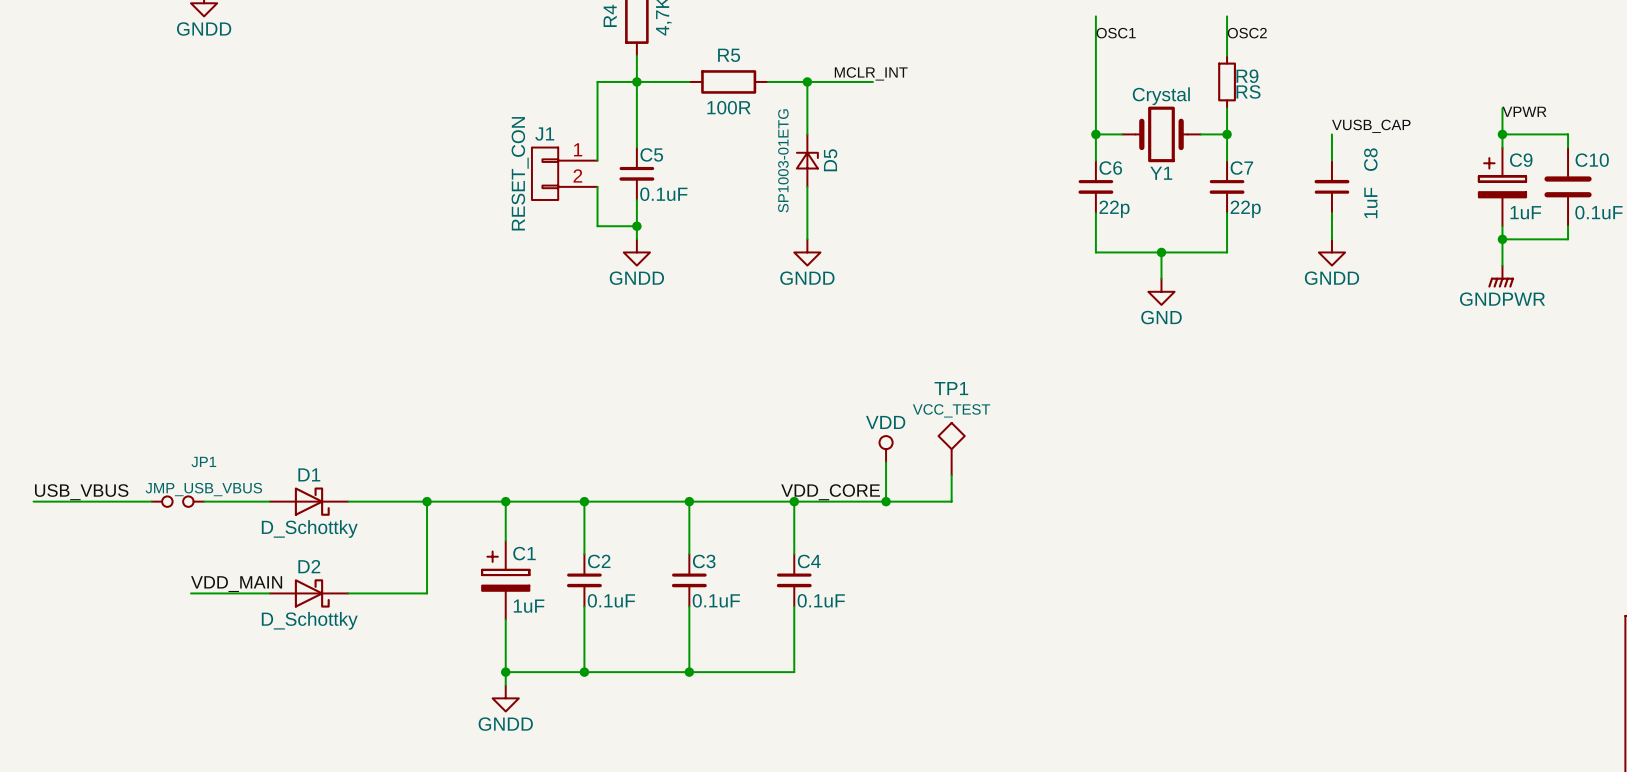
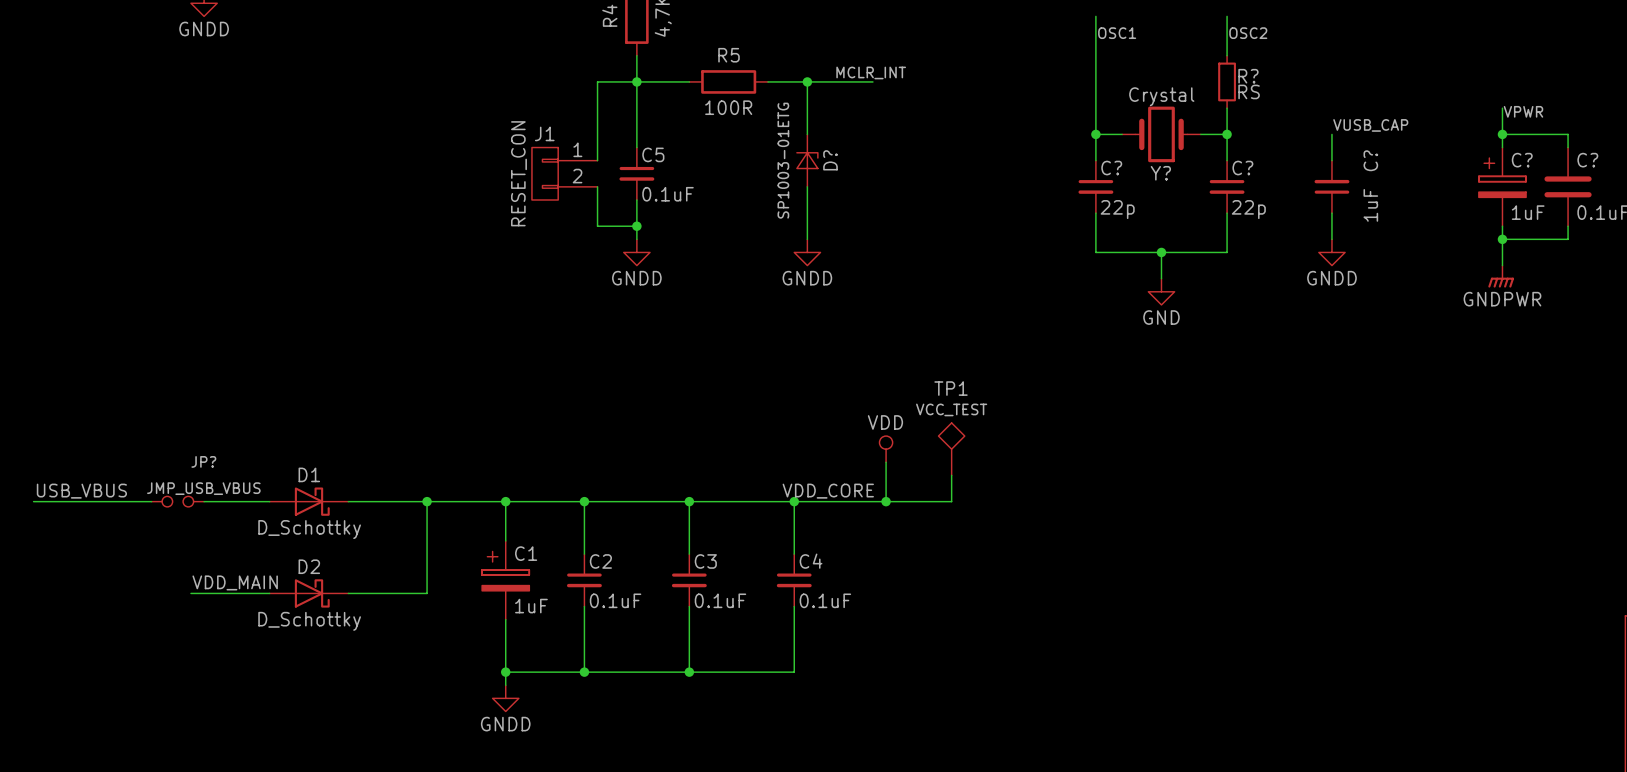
R9 name: R9 (1247, 76) -> R? (1248, 76)
C8 name: C8 (1370, 159) -> C? (1370, 160)
D5 name: D5 (830, 160) -> D? (830, 160)
C9 name: C9 (1521, 160) -> C? (1522, 160)
C10 name: C10 (1592, 160) -> C? (1587, 160)
C6 name: C6 (1110, 168) -> C? (1111, 168)
C7 name: C7 (1241, 168) -> C? (1242, 168)
Y1 name: Y1 (1161, 173) -> Y? (1160, 173)
JP1 name: JP1 (203, 461) -> JP? (203, 461)

